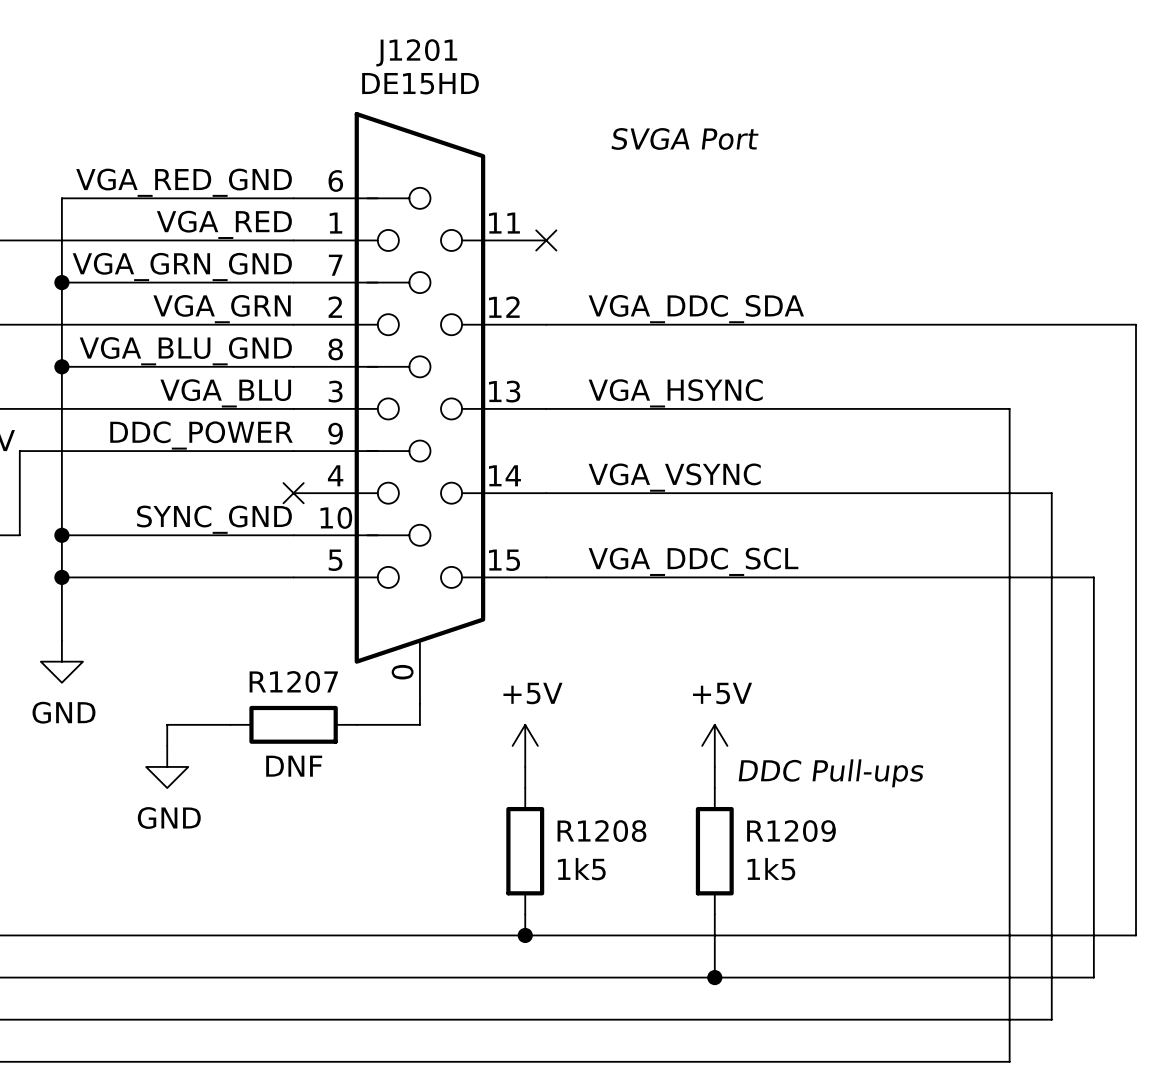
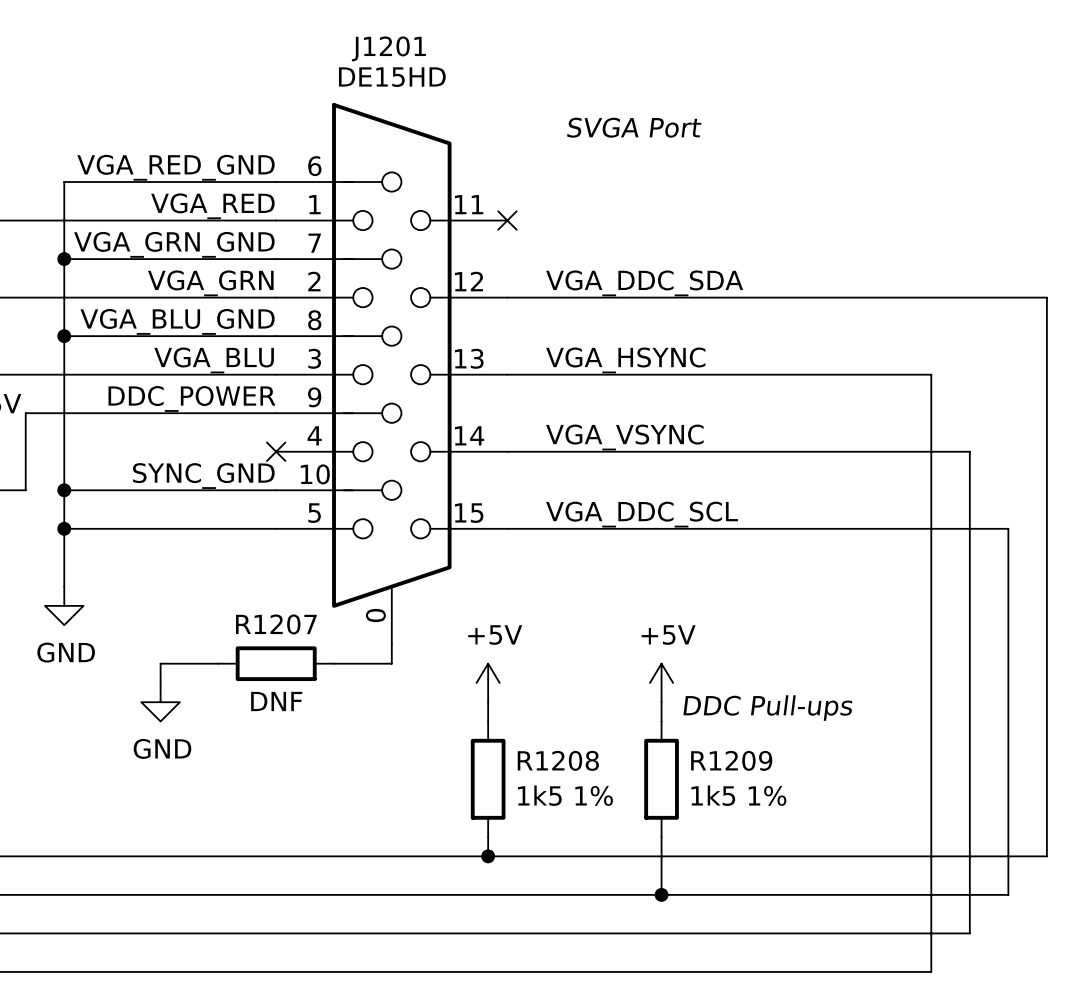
R1208 value: 1k5 (581, 869) -> 1k5 1% (565, 795)
R1209 value: 1k5 (771, 869) -> 1k5 1% (738, 795)

